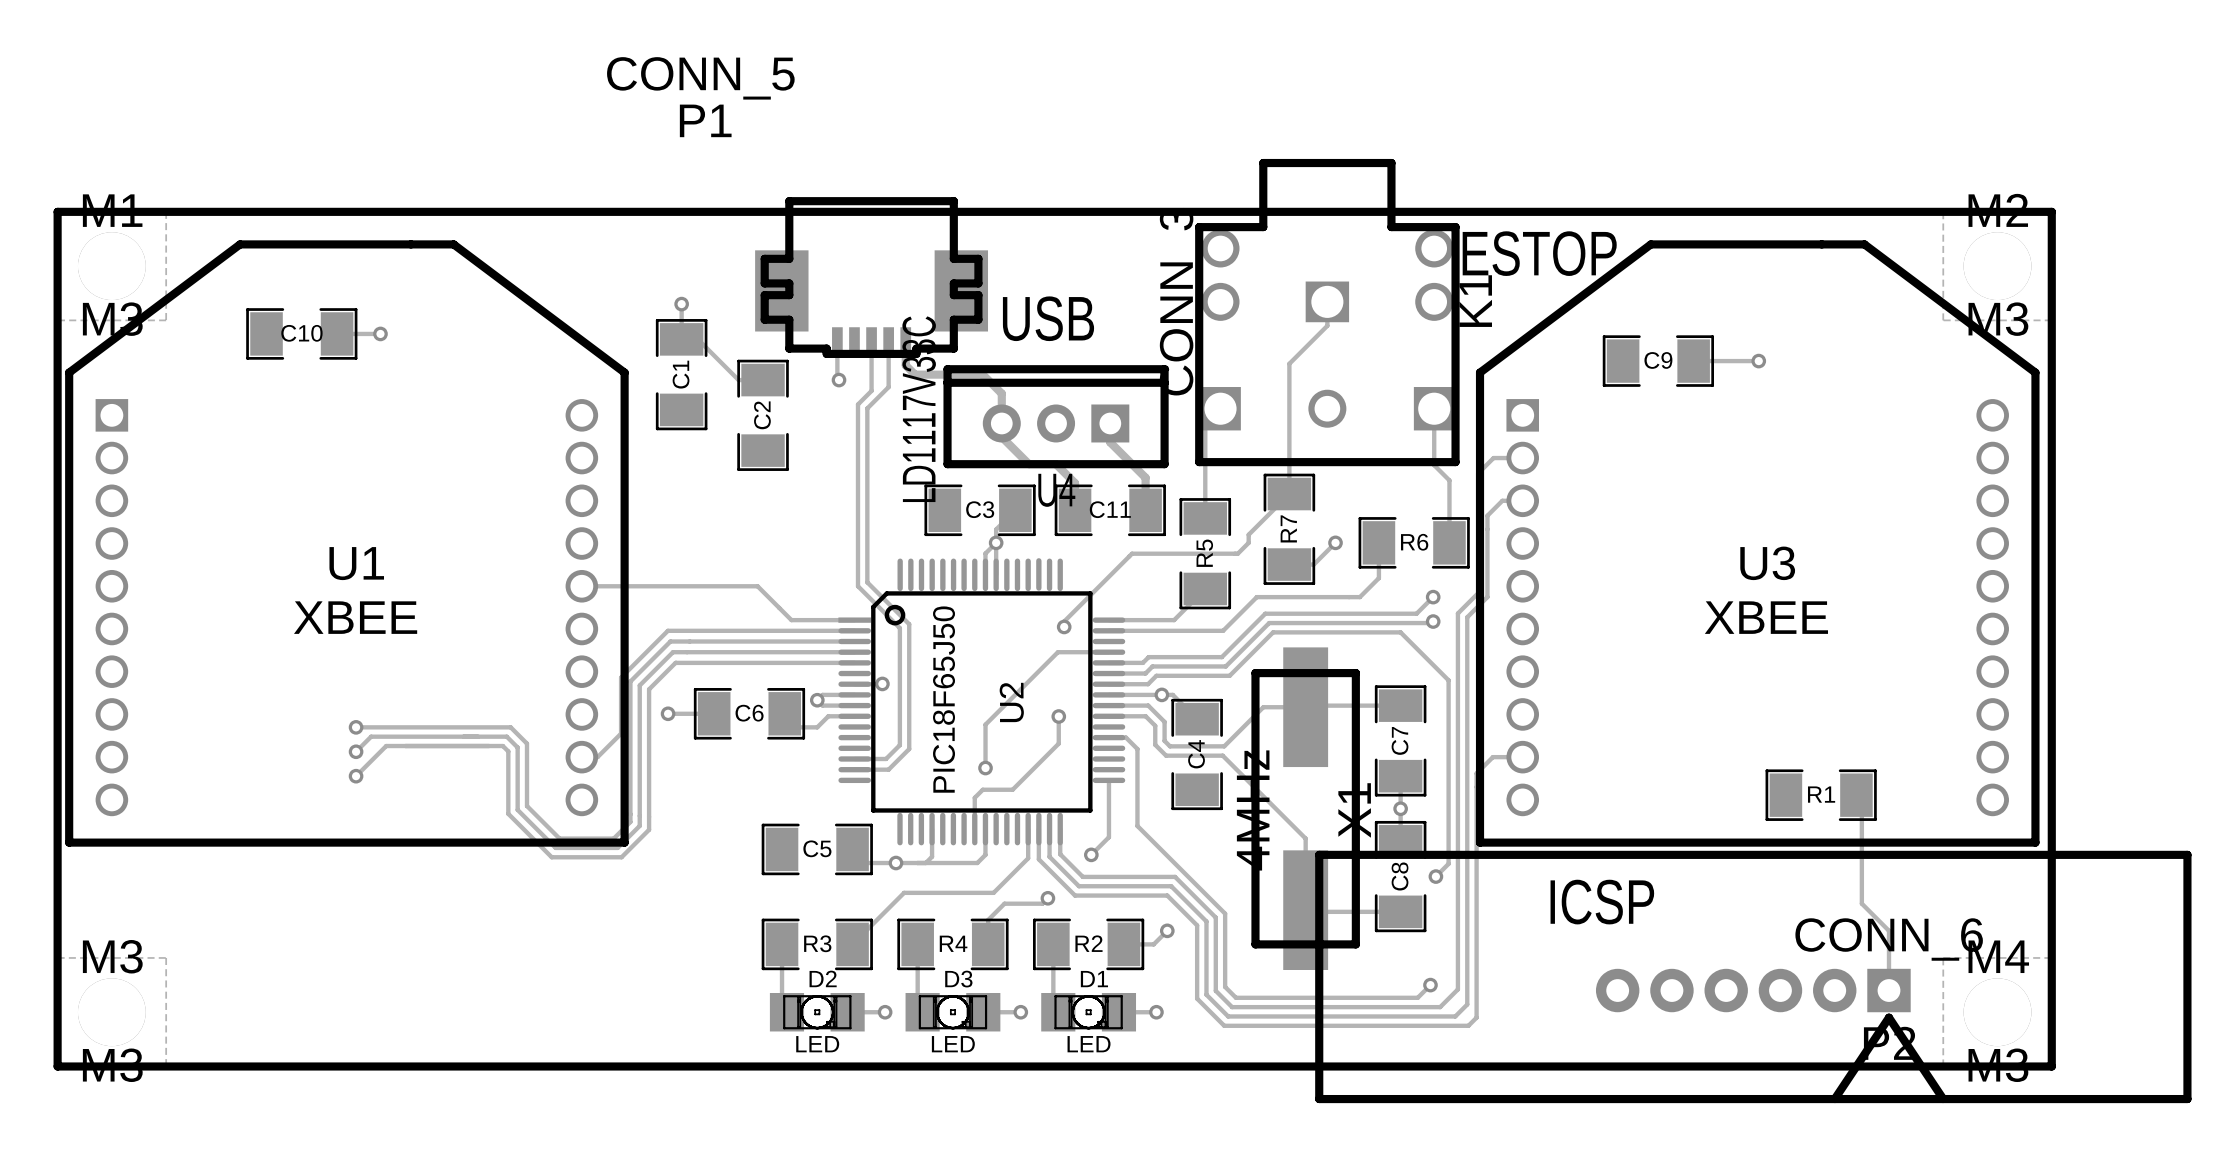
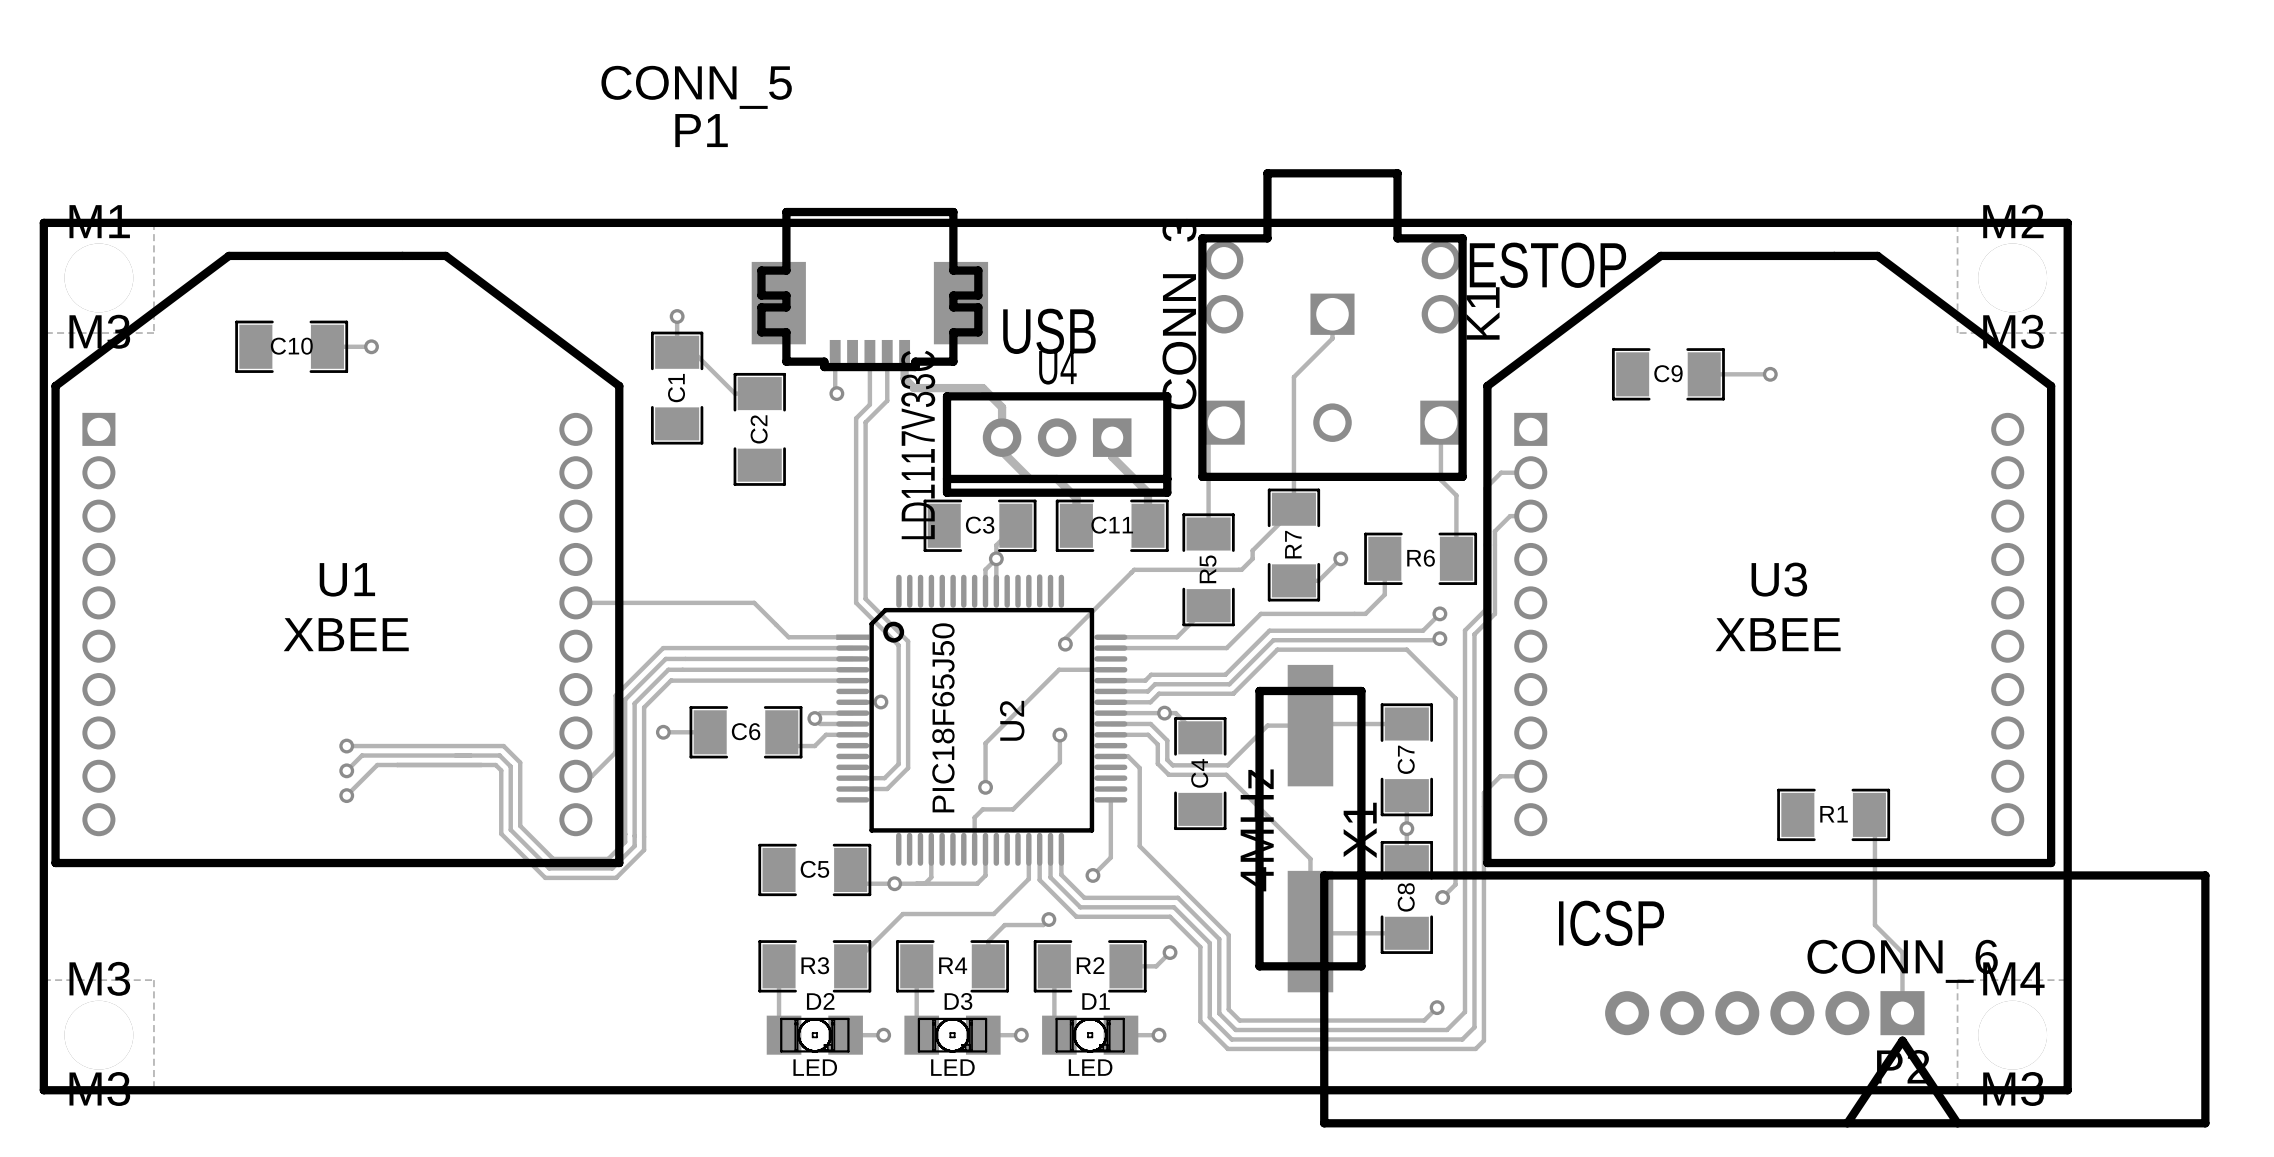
U4 footprint: [943, 365, 1169, 469] -> [942, 392, 1172, 497]
U4 value position: LD1117V33C (919, 409) -> LD1117V33C (918, 444)
U4 name position: U4 (1056, 490) -> U4 (1057, 367)

